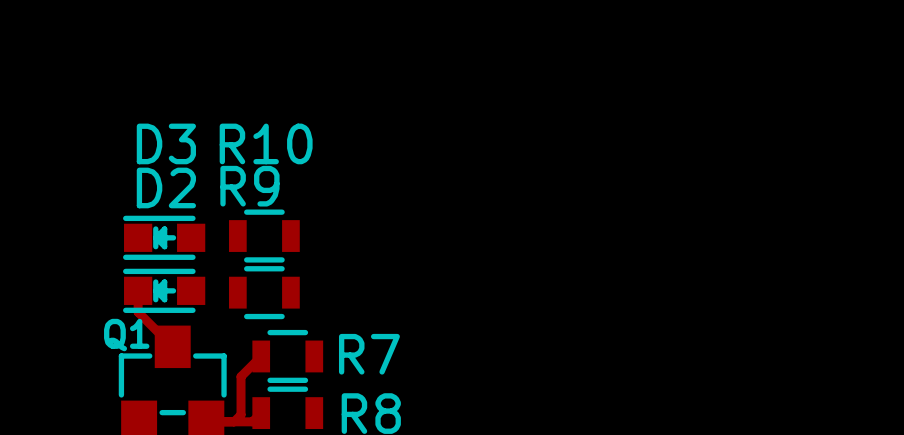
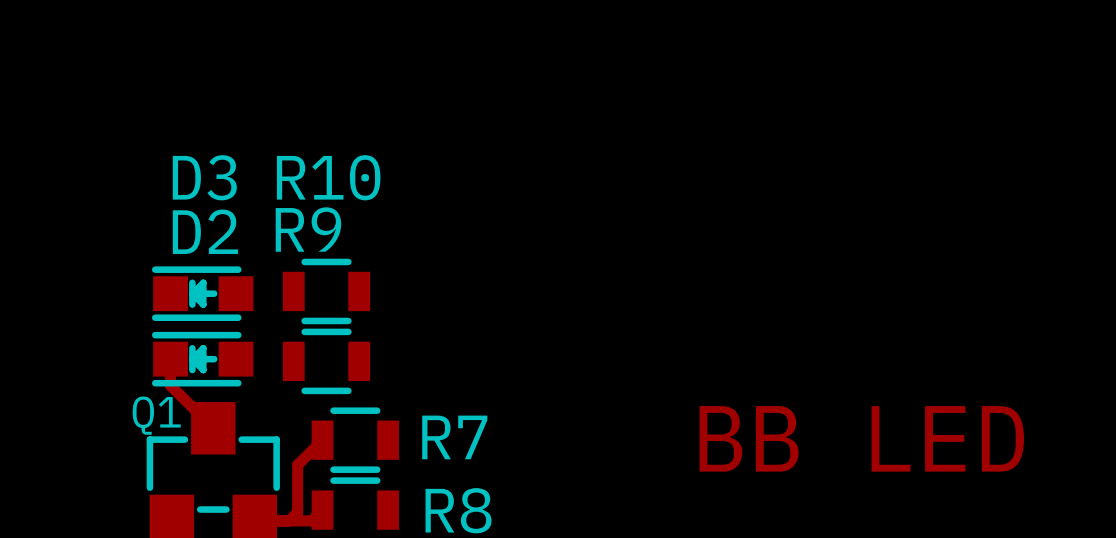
text: none -> BB LED (861, 438)

